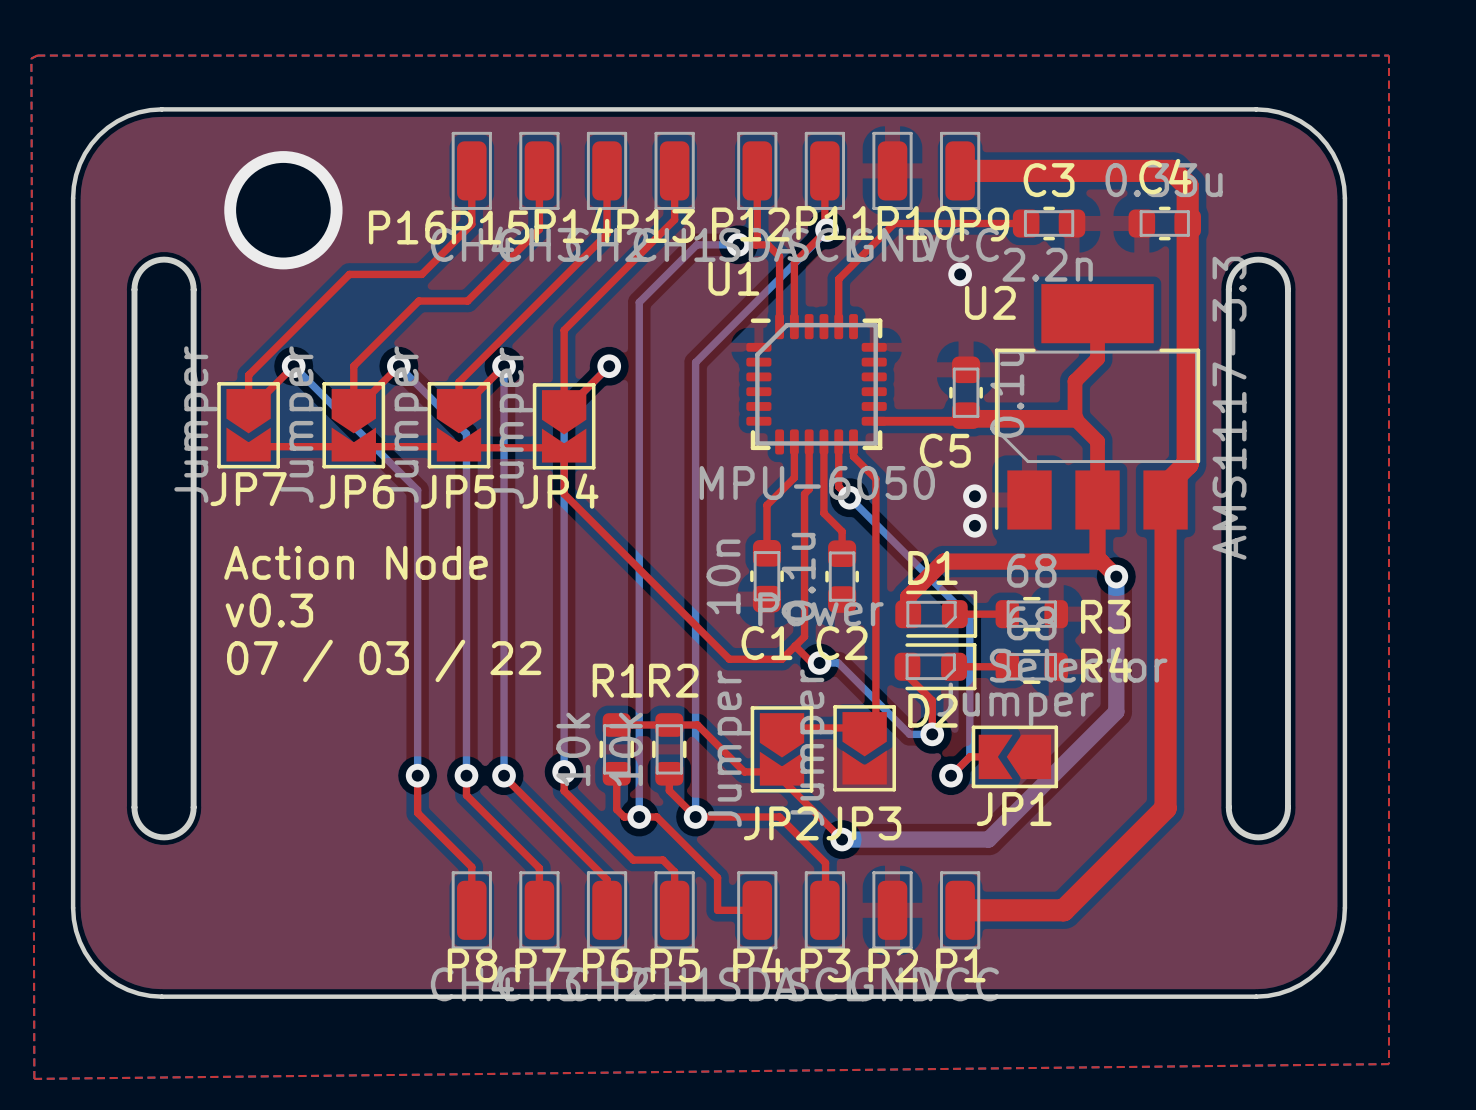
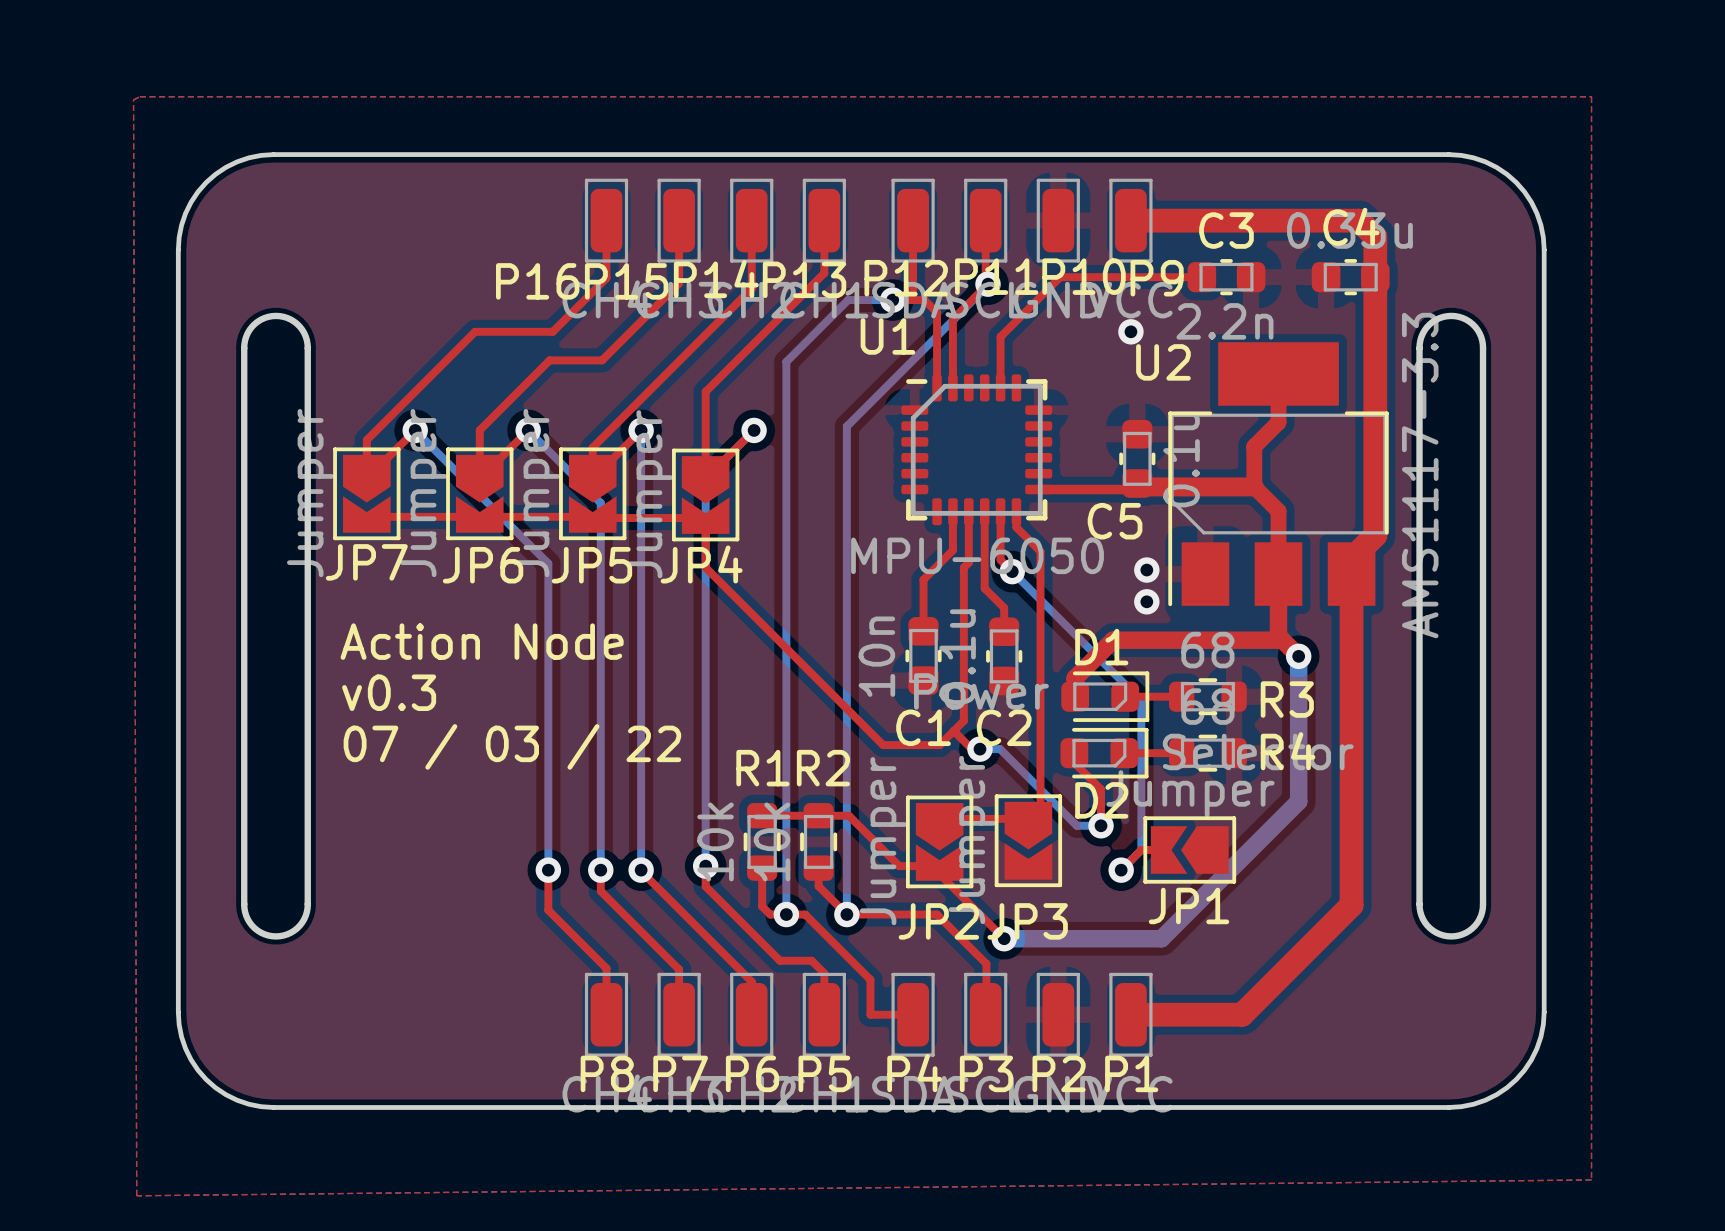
via: (283, 210) -> none

